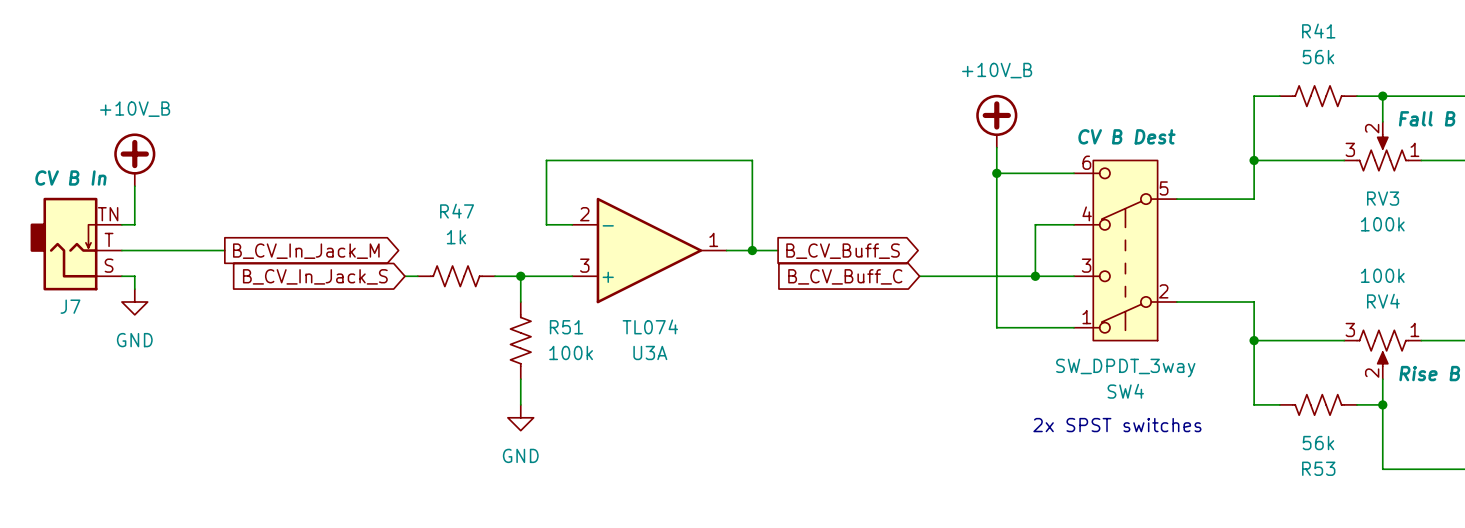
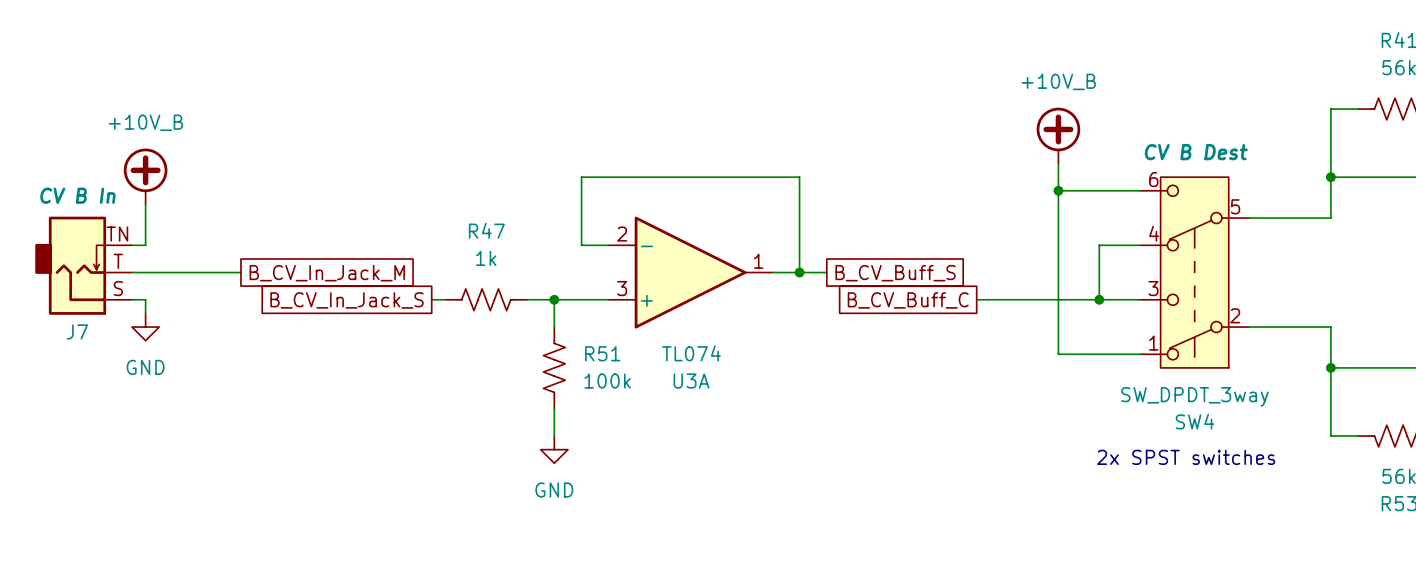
global label shape: output (306, 251) -> passive (327, 273)
global label shape: output (843, 251) -> passive (895, 273)
global label shape: input (315, 276) -> passive (347, 300)
global label shape: input (845, 276) -> passive (908, 300)

